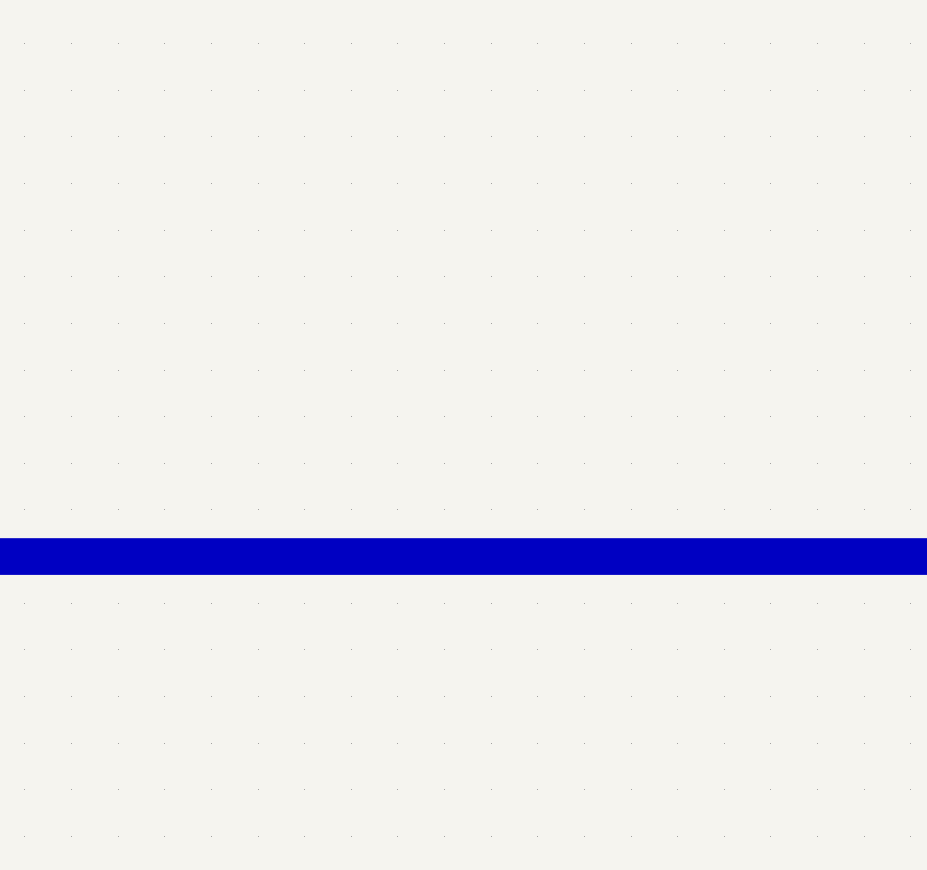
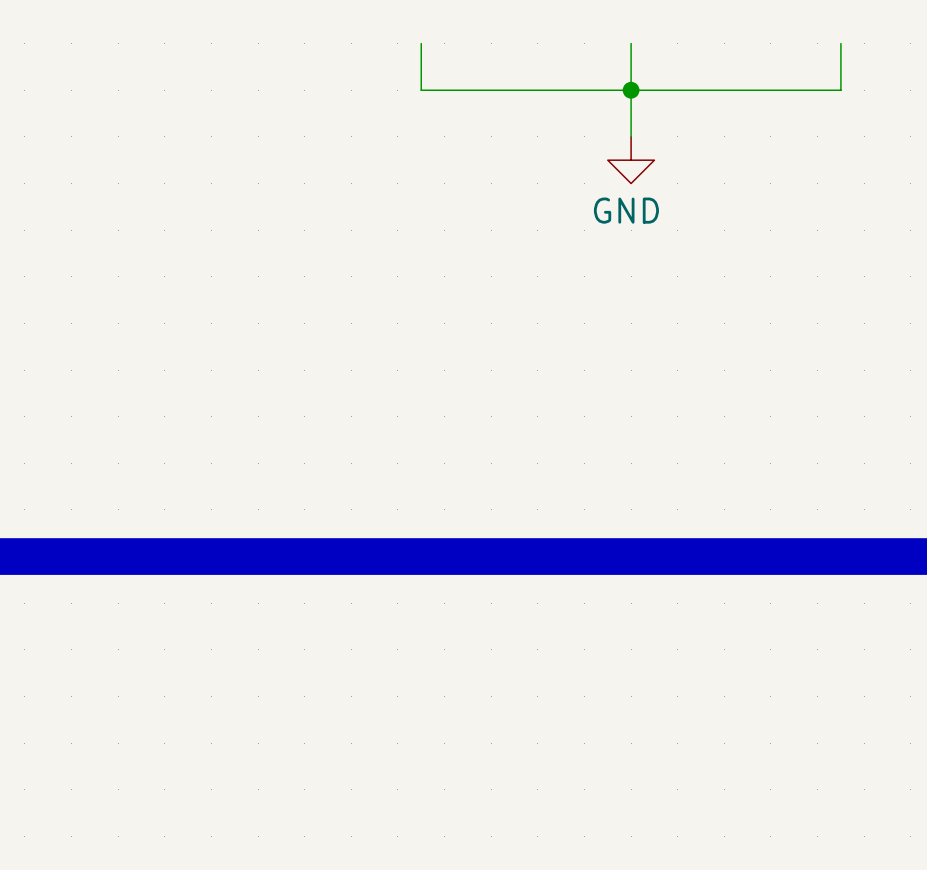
wire: none -> (421, 43) (421, 90) (840, 90) (840, 43)
wire: none -> (631, 43) (631, 136)
junction: none -> (631, 90)
power symbol: none -> GND (631, 160)

